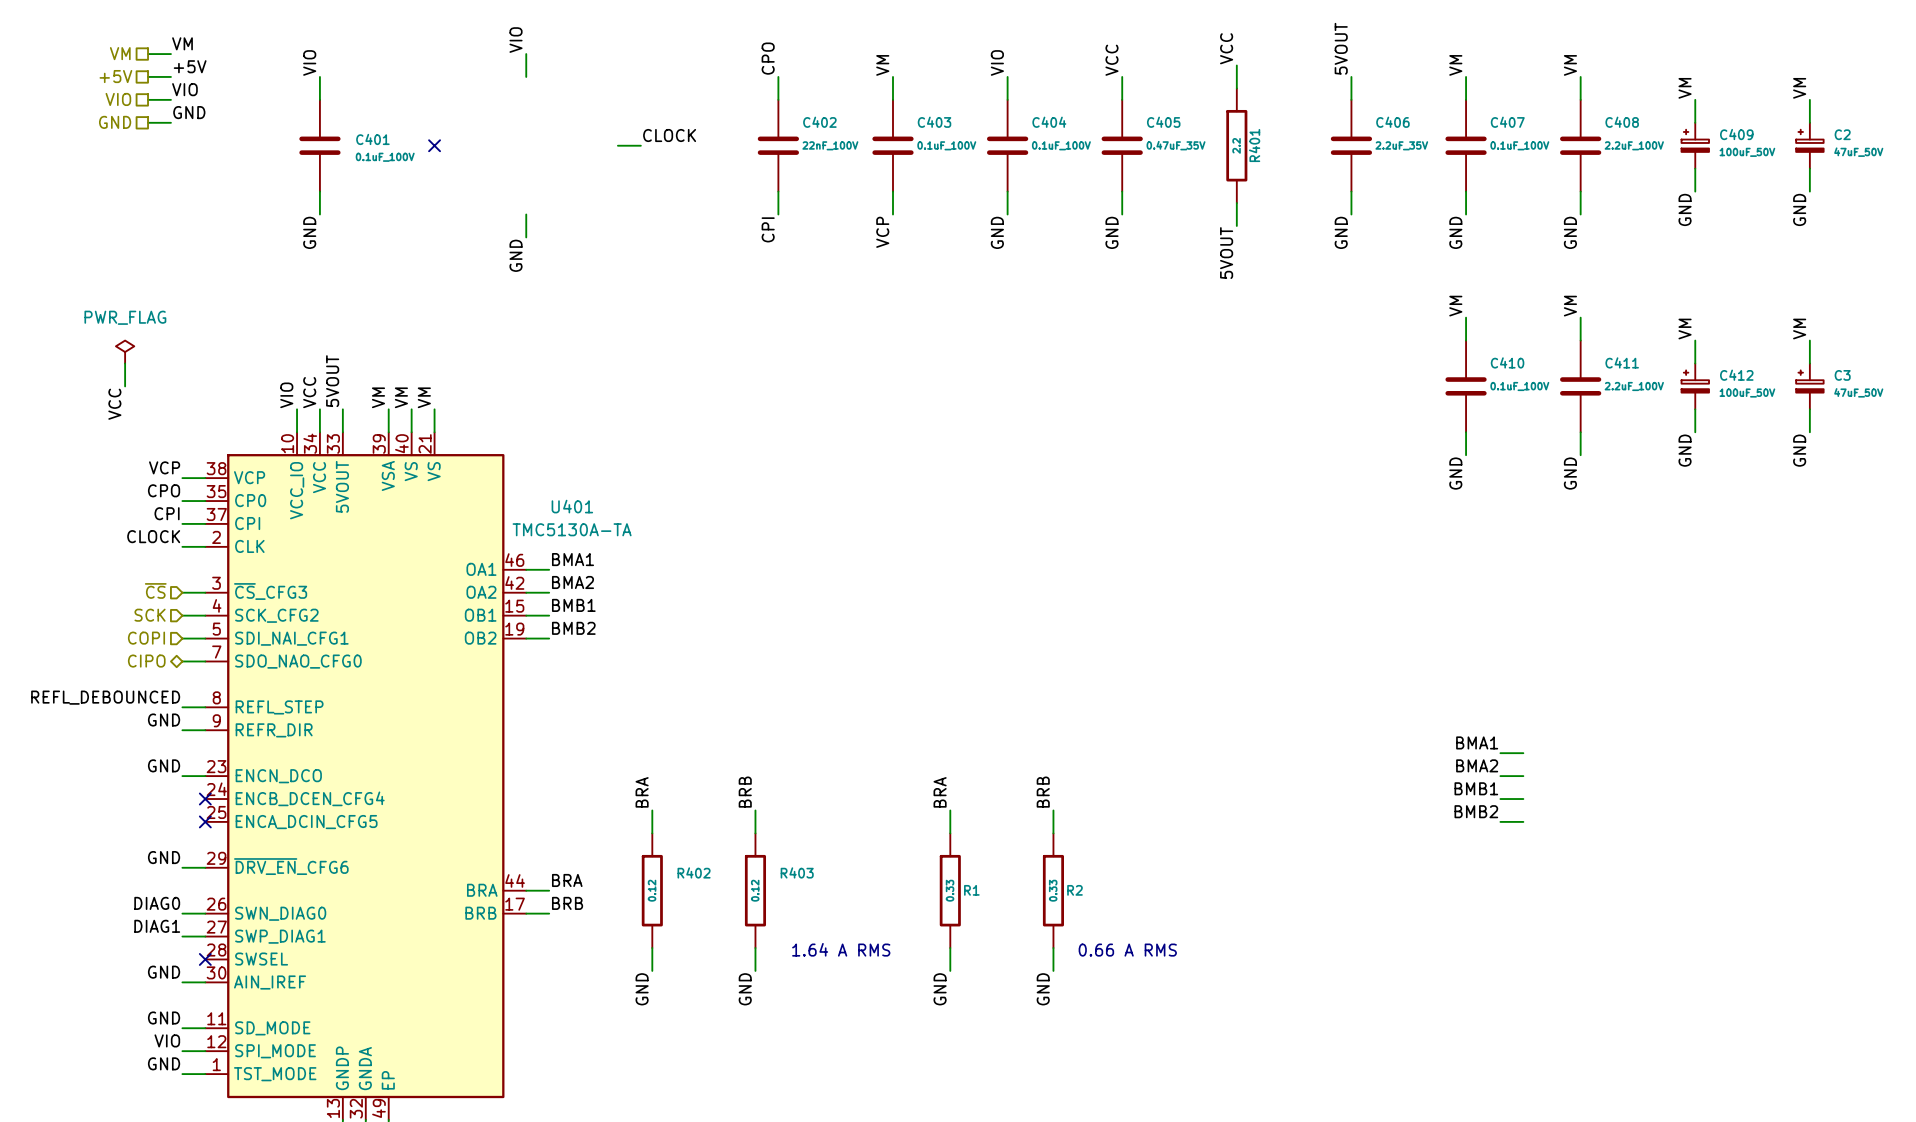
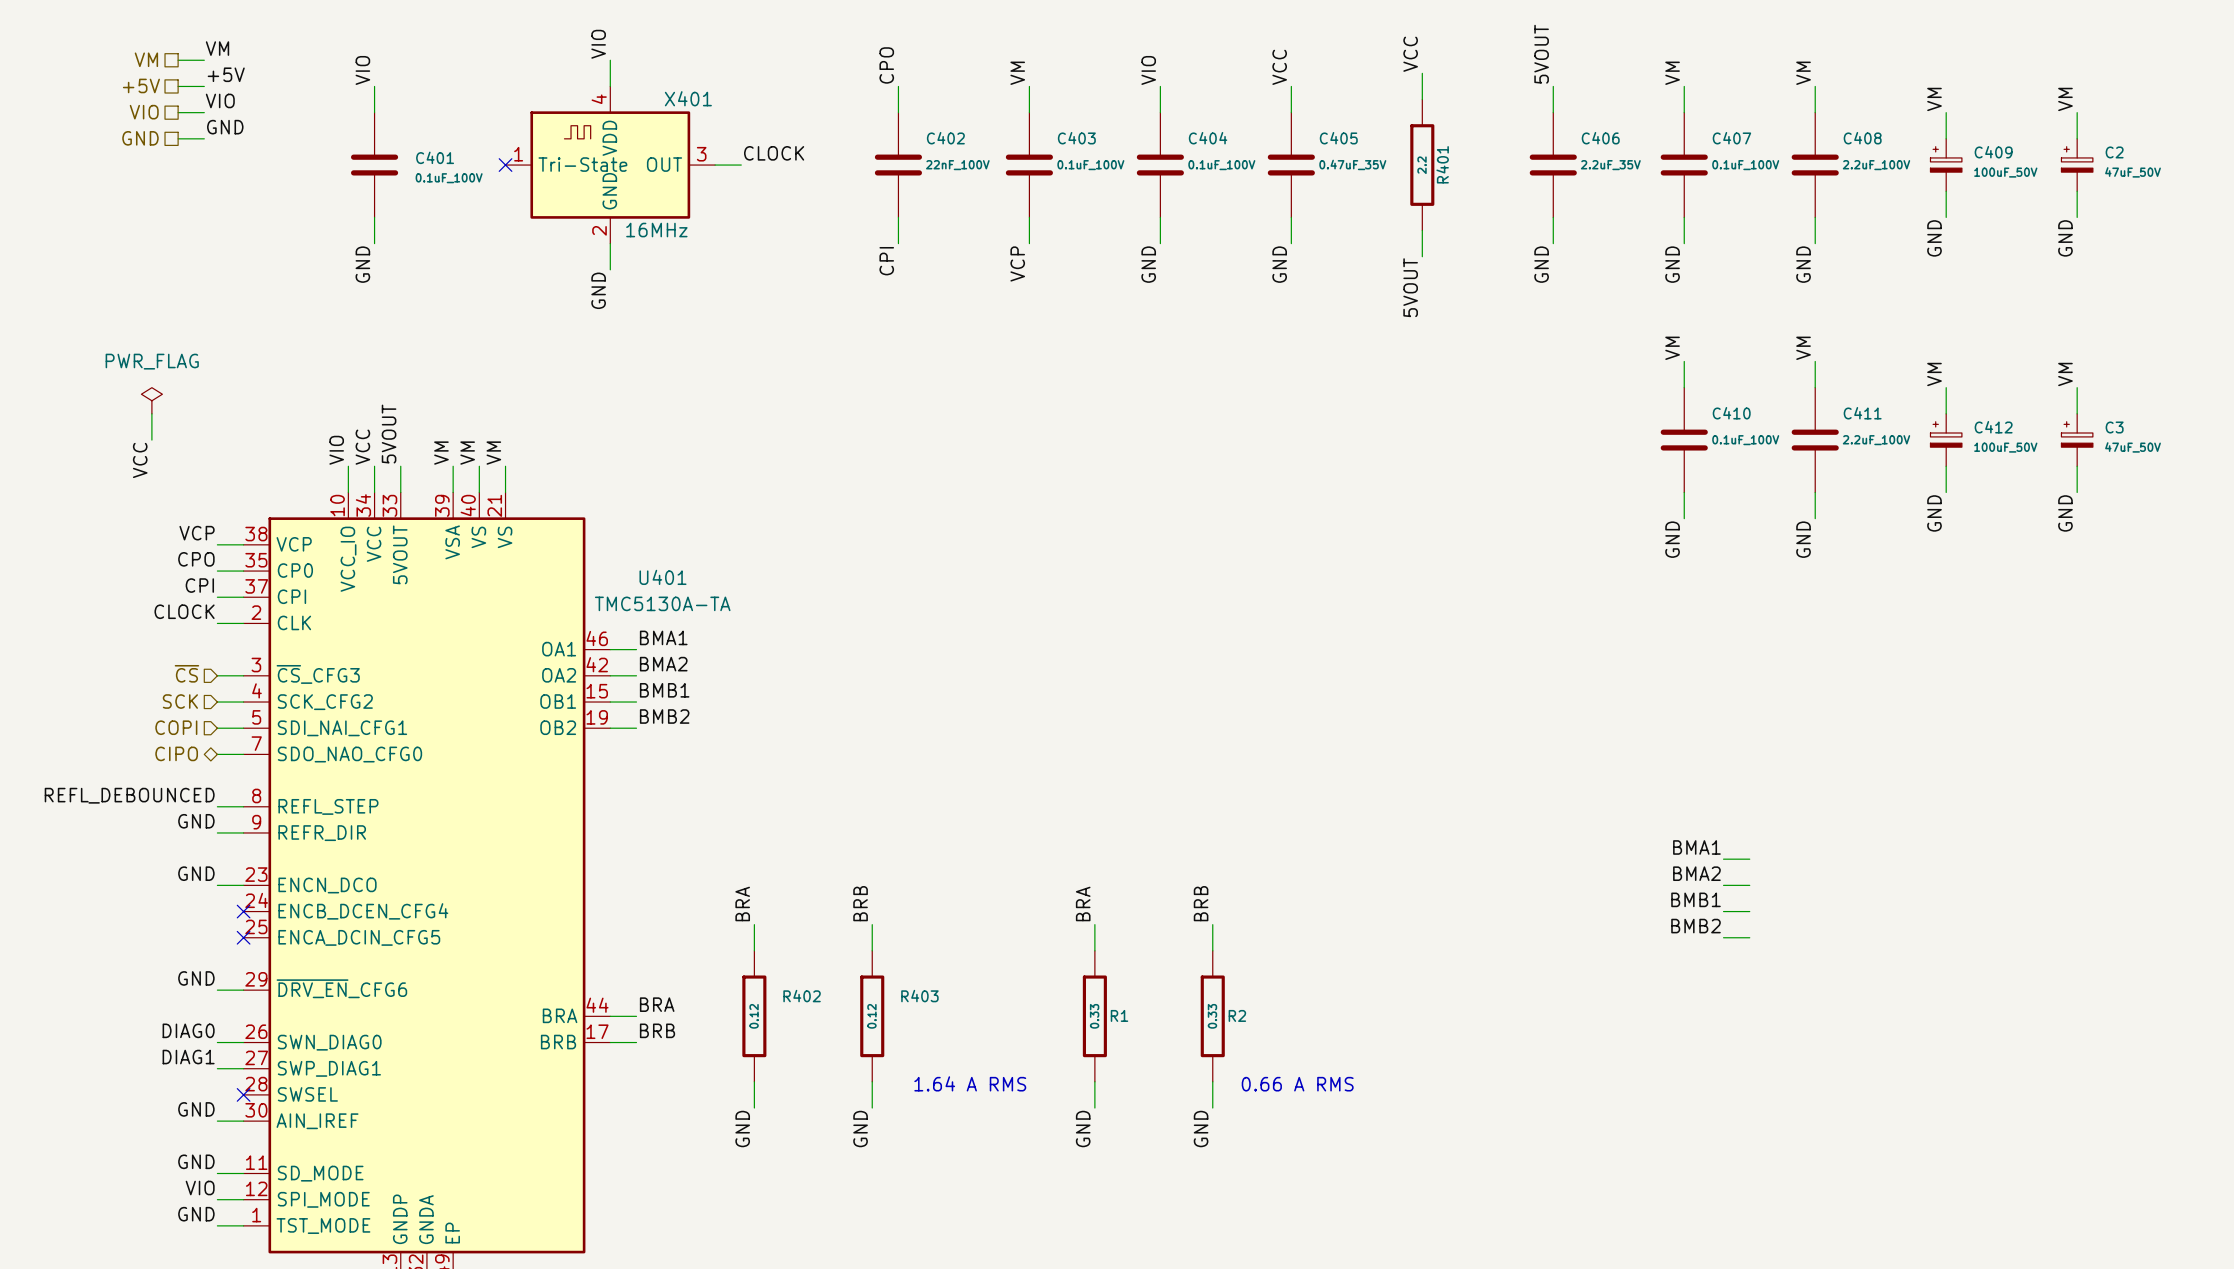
X401: none -> 16MHz (610, 165)

